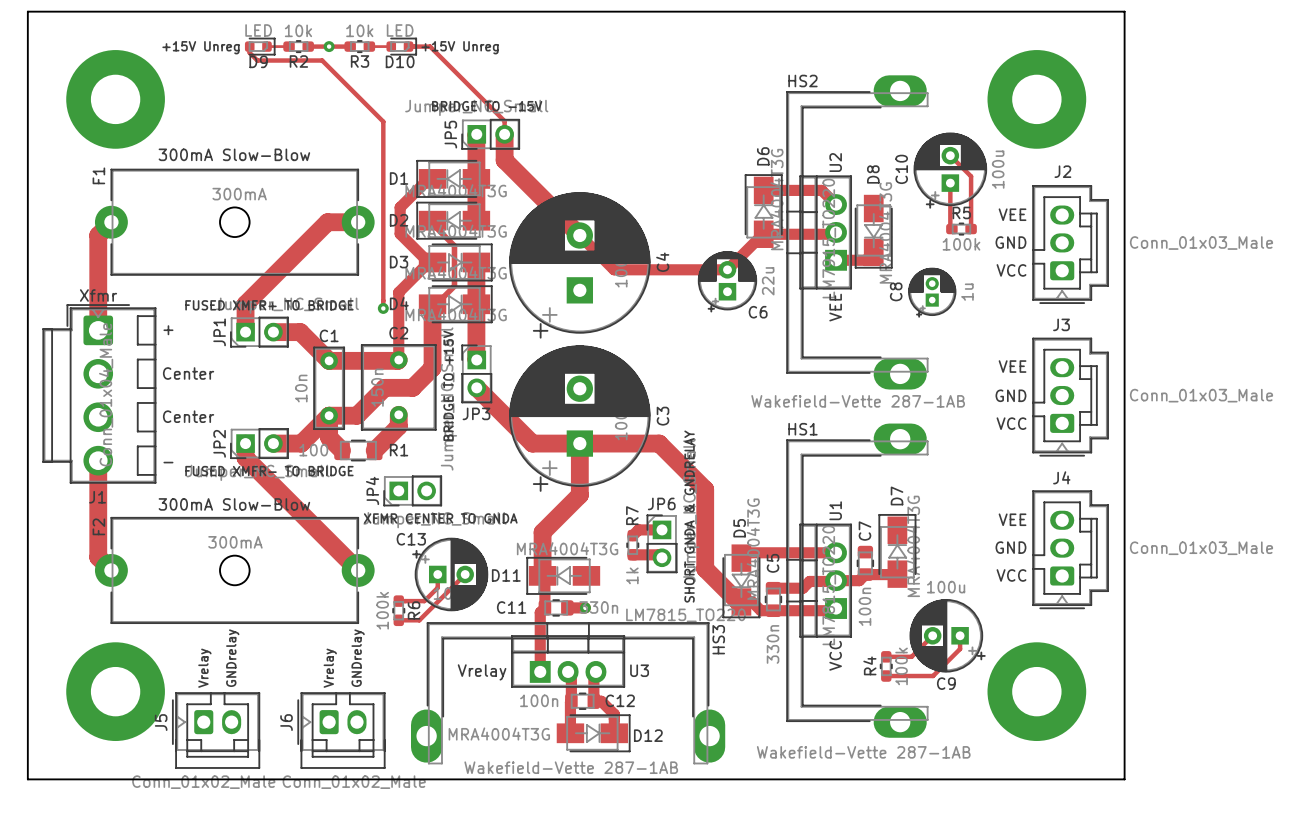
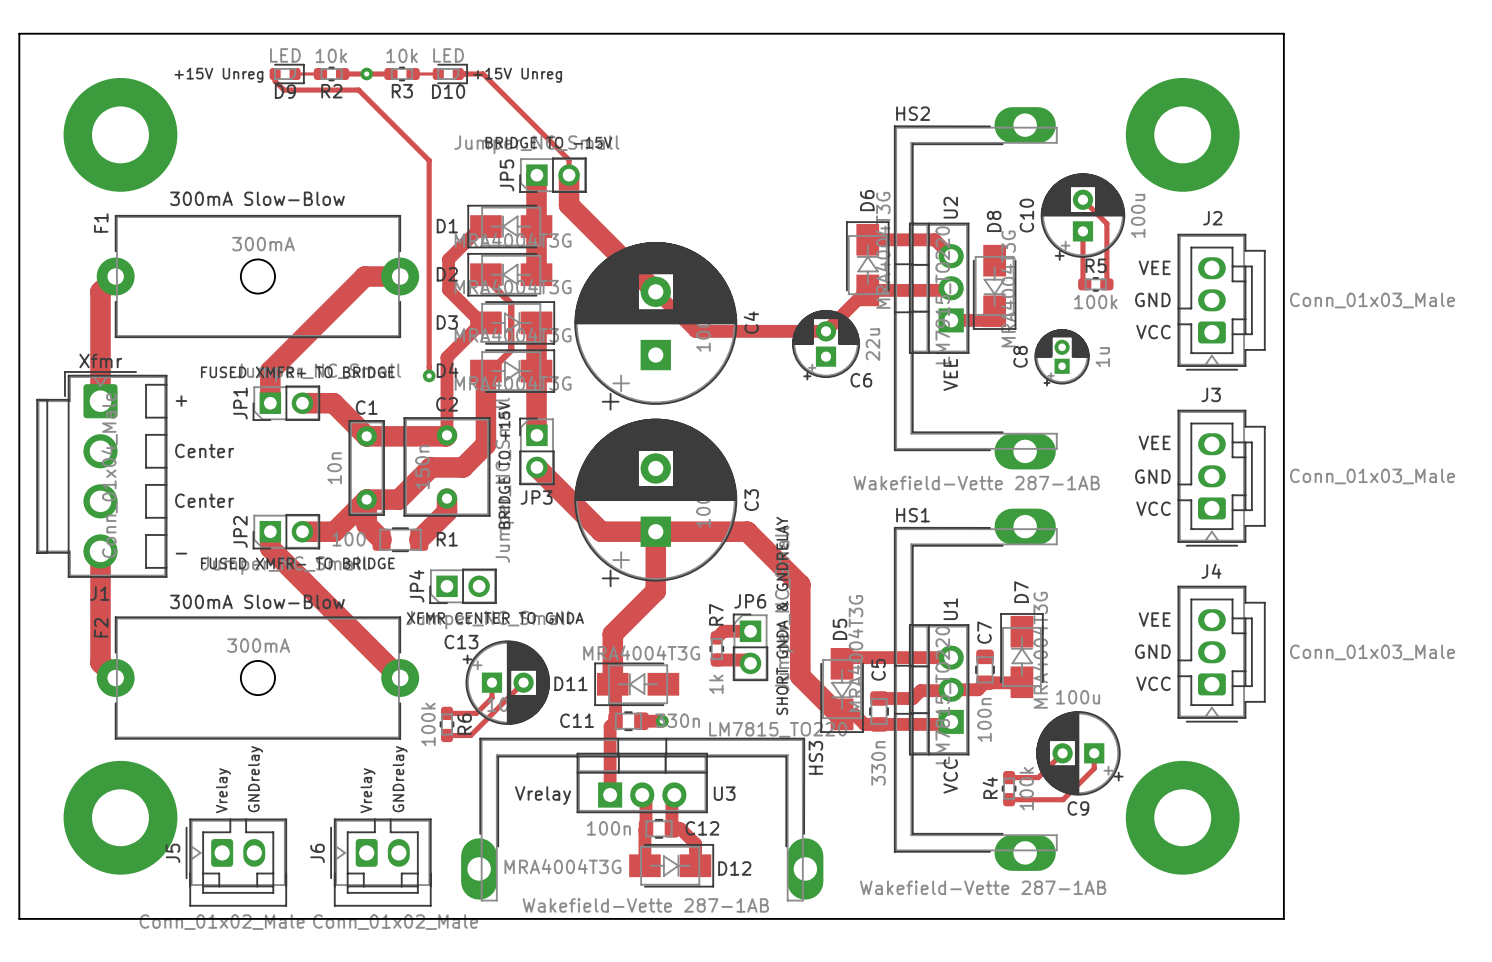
J2 footprint: [1032, 185, 1109, 304] -> [1177, 233, 1266, 371]
J3 footprint: [1032, 337, 1109, 457] -> [1177, 409, 1266, 547]
J4 footprint: [1032, 490, 1109, 609] -> [1177, 585, 1266, 723]

